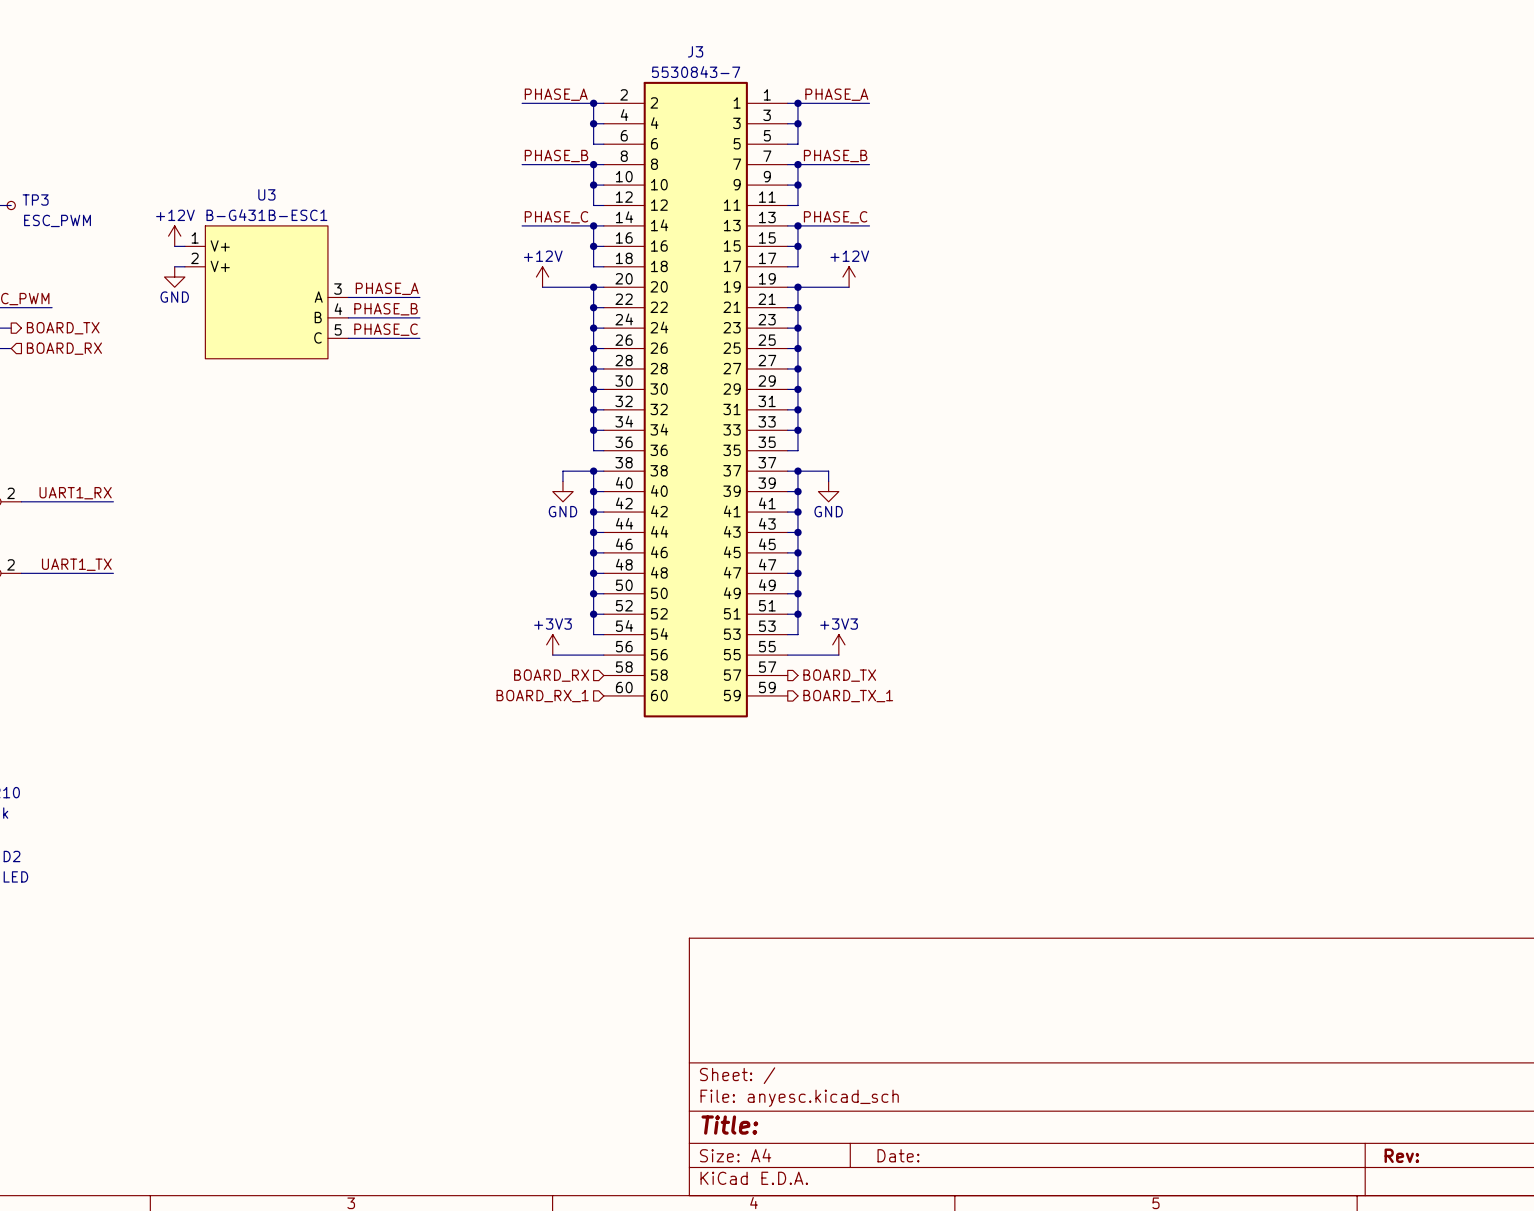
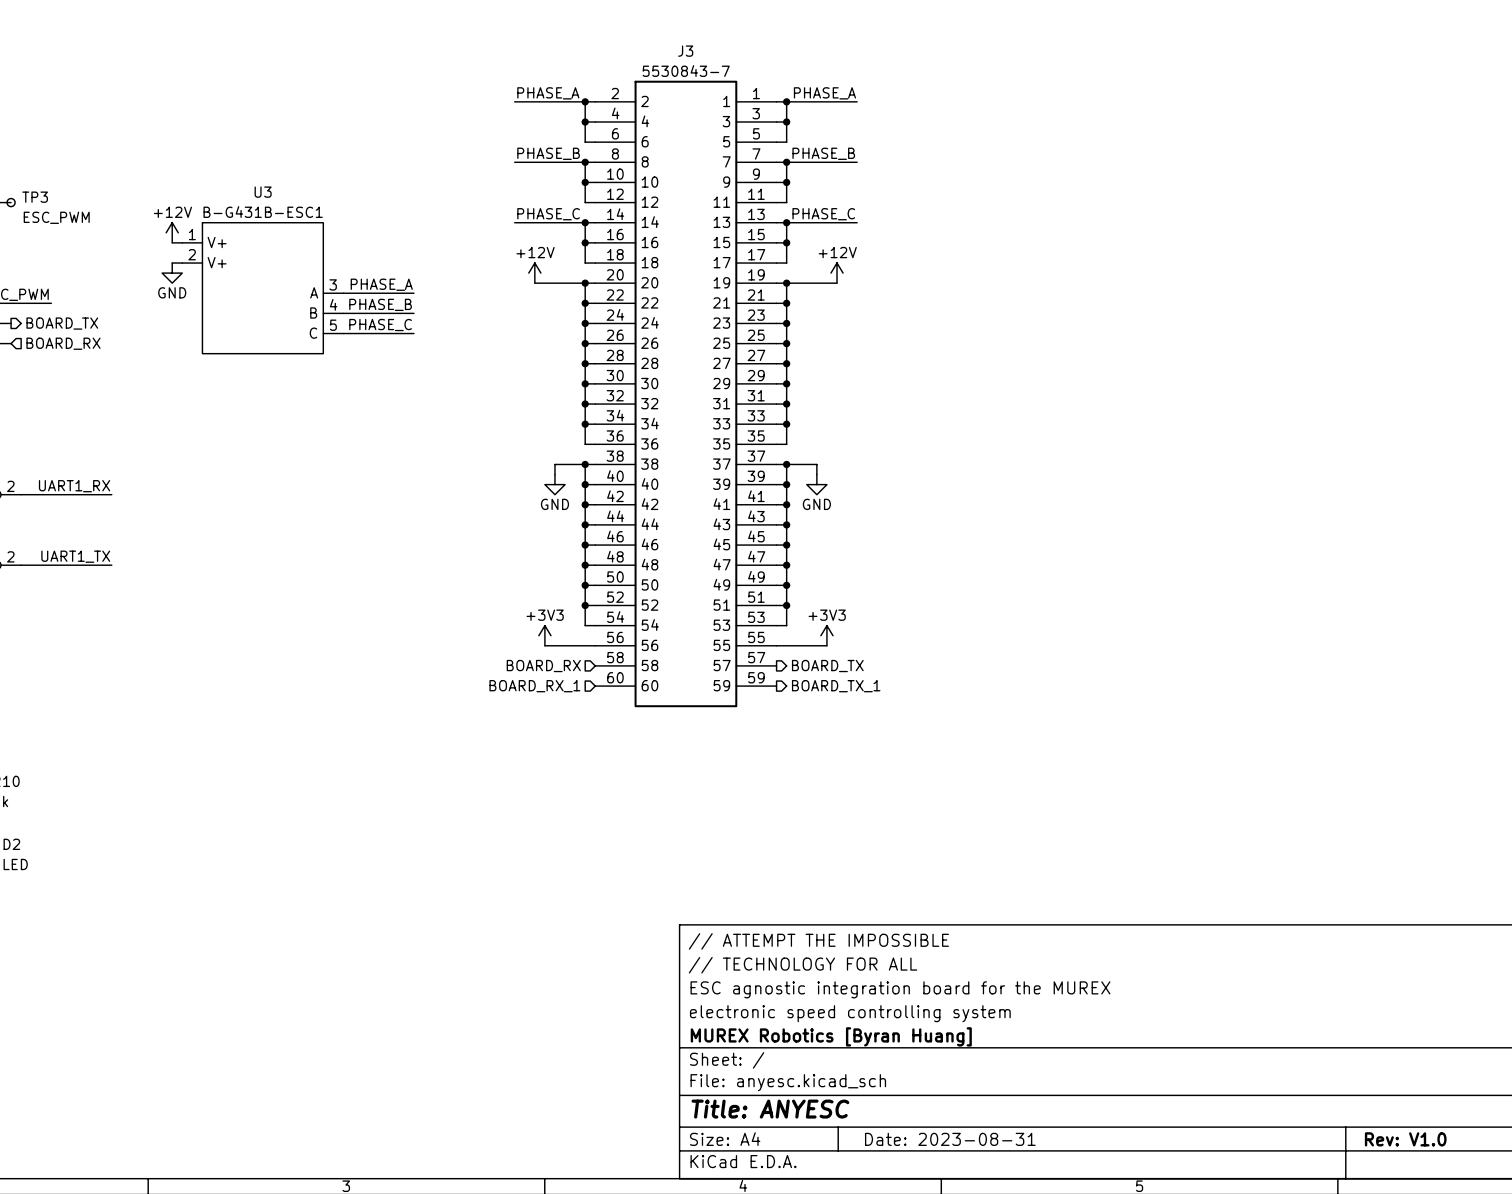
title block: none -> // ATTEMPT THE IMPOSSIBLE (818, 941)
title block: none -> // TECHNOLOGY FOR ALL (803, 965)
title block: none -> ESC agnostic integration board for the MUREX (900, 989)
title block: none -> electronic speed controlling system (850, 1013)
title block: none -> MUREX Robotics [Byran Huang] (831, 1036)
title block: Title: (729, 1125) -> Title: ANYESC (770, 1109)
title block: Date: (898, 1155) -> Date: 2023-08-31 (950, 1139)
title block: Rev: (1401, 1155) -> Rev: V1.0 (1405, 1139)

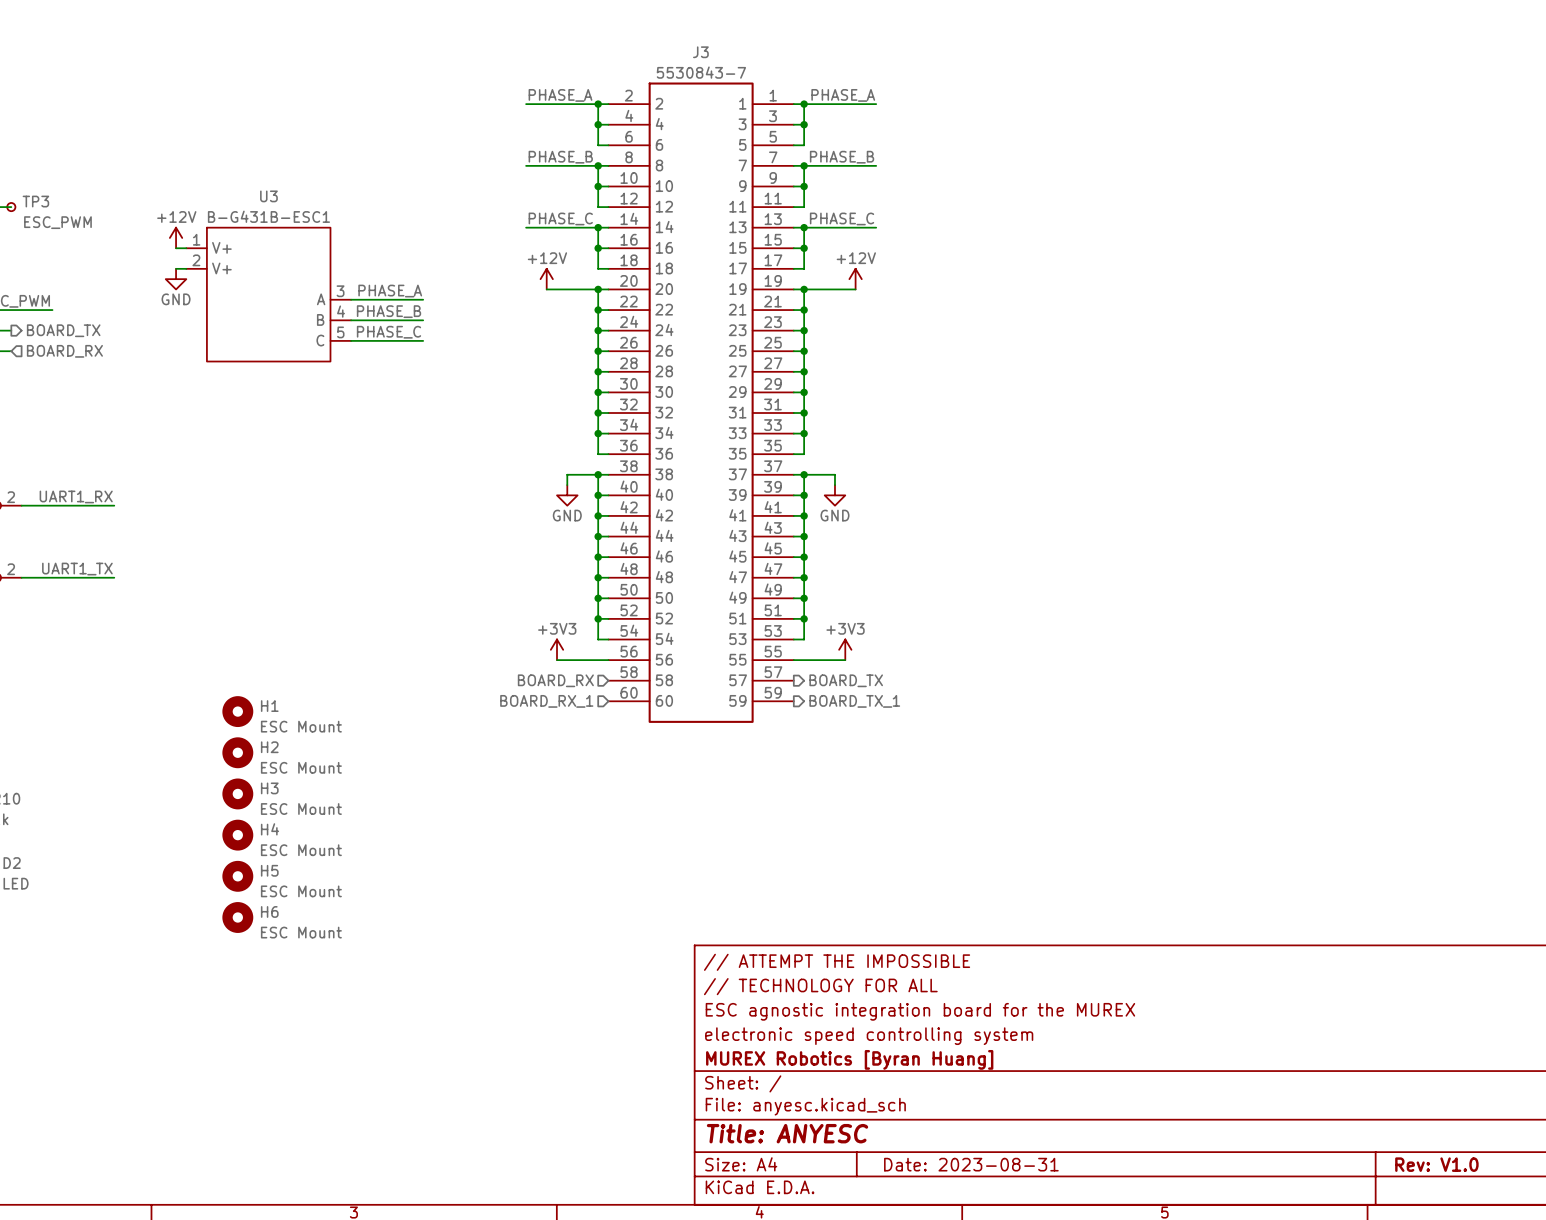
H1: none -> ESC Mount (237, 711)
H2: none -> ESC Mount (237, 752)
H3: none -> ESC Mount (237, 793)
H4: none -> ESC Mount (237, 835)
H5: none -> ESC Mount (237, 876)
H6: none -> ESC Mount (237, 917)

